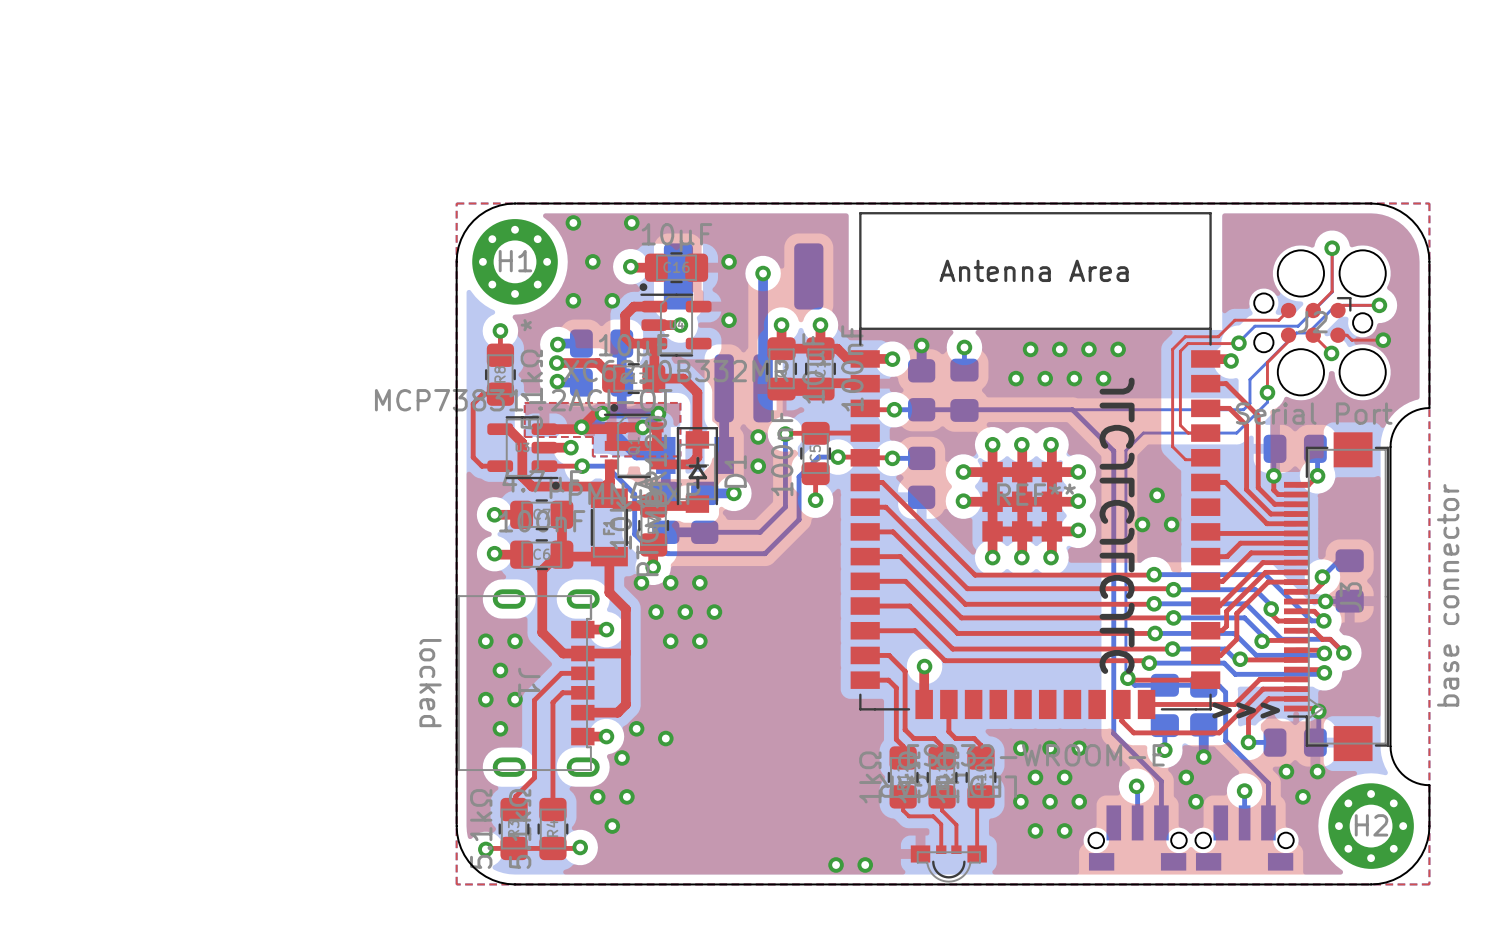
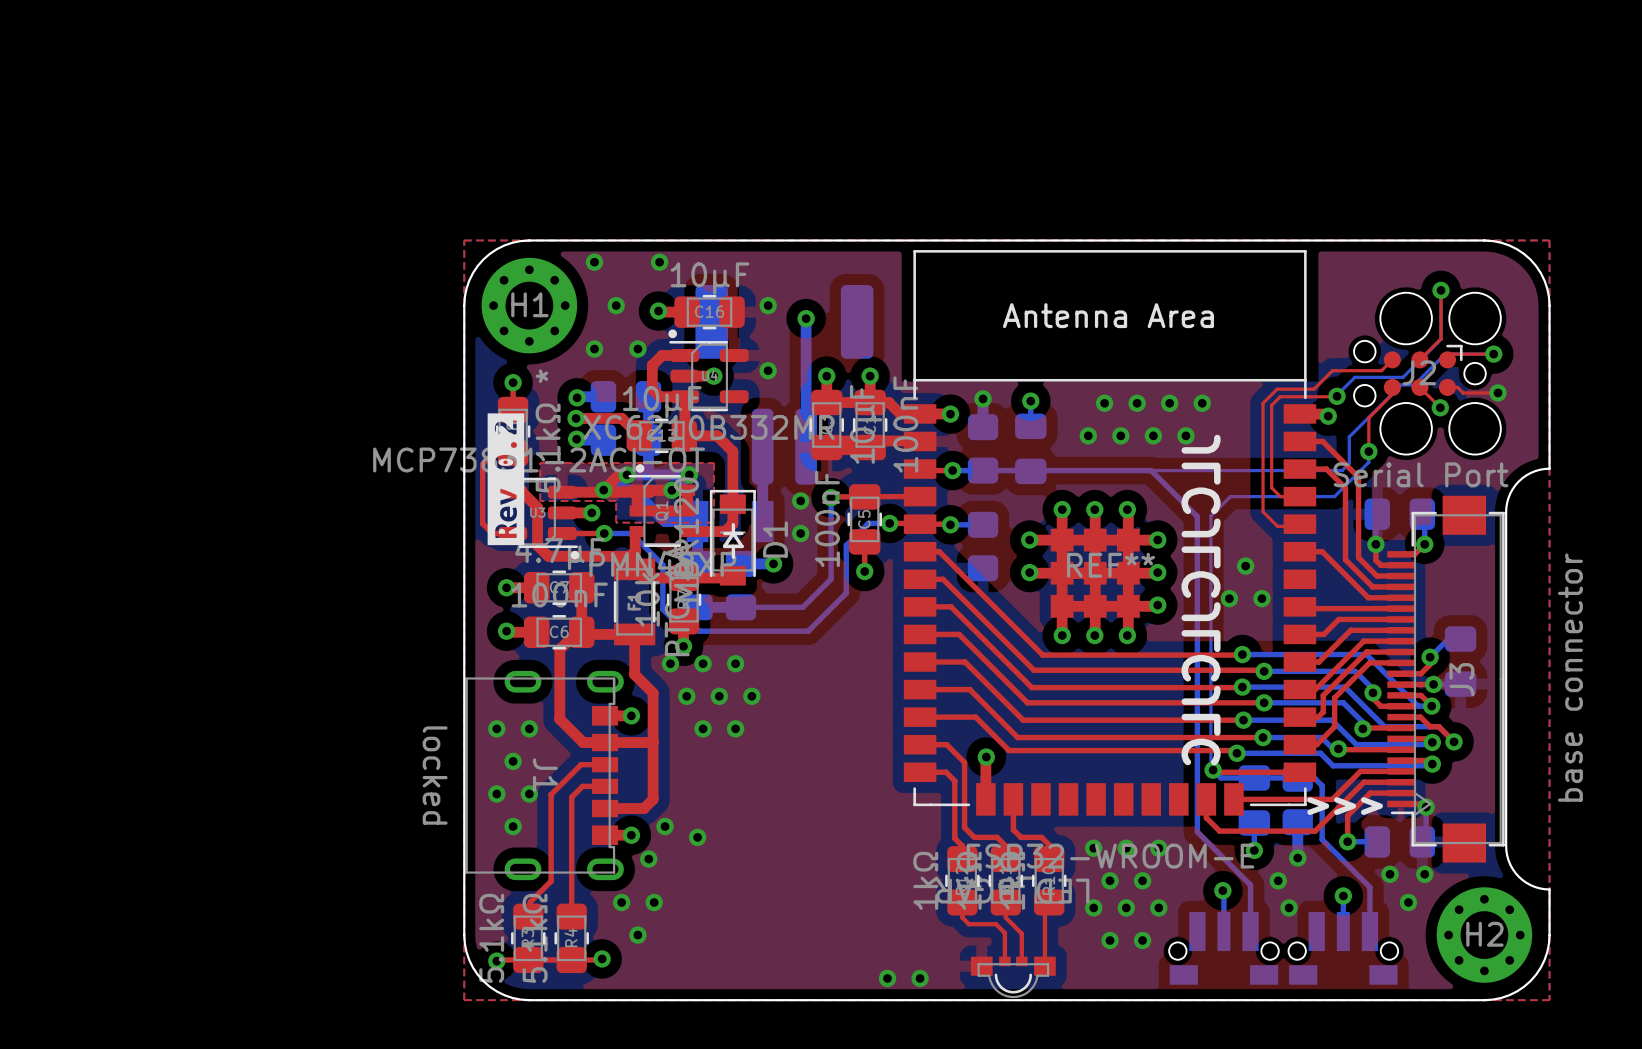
drawing: none -> [487, 413, 525, 546]

